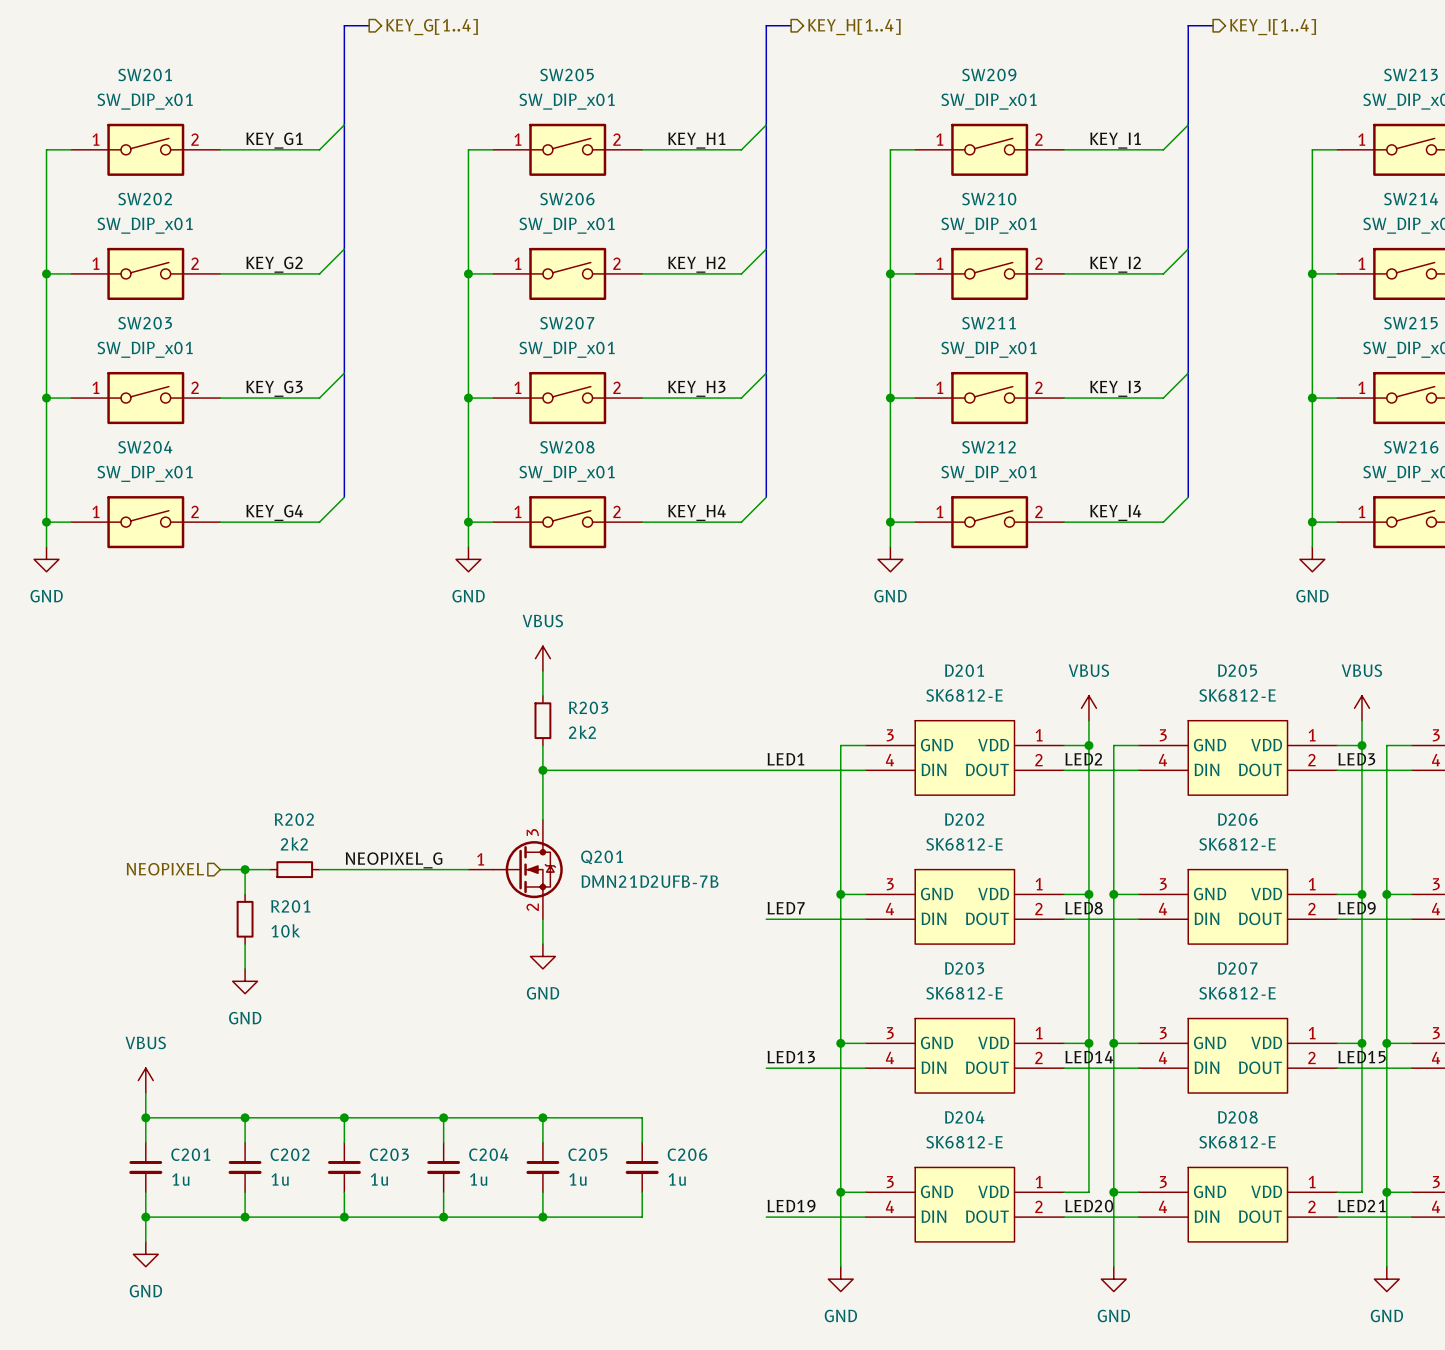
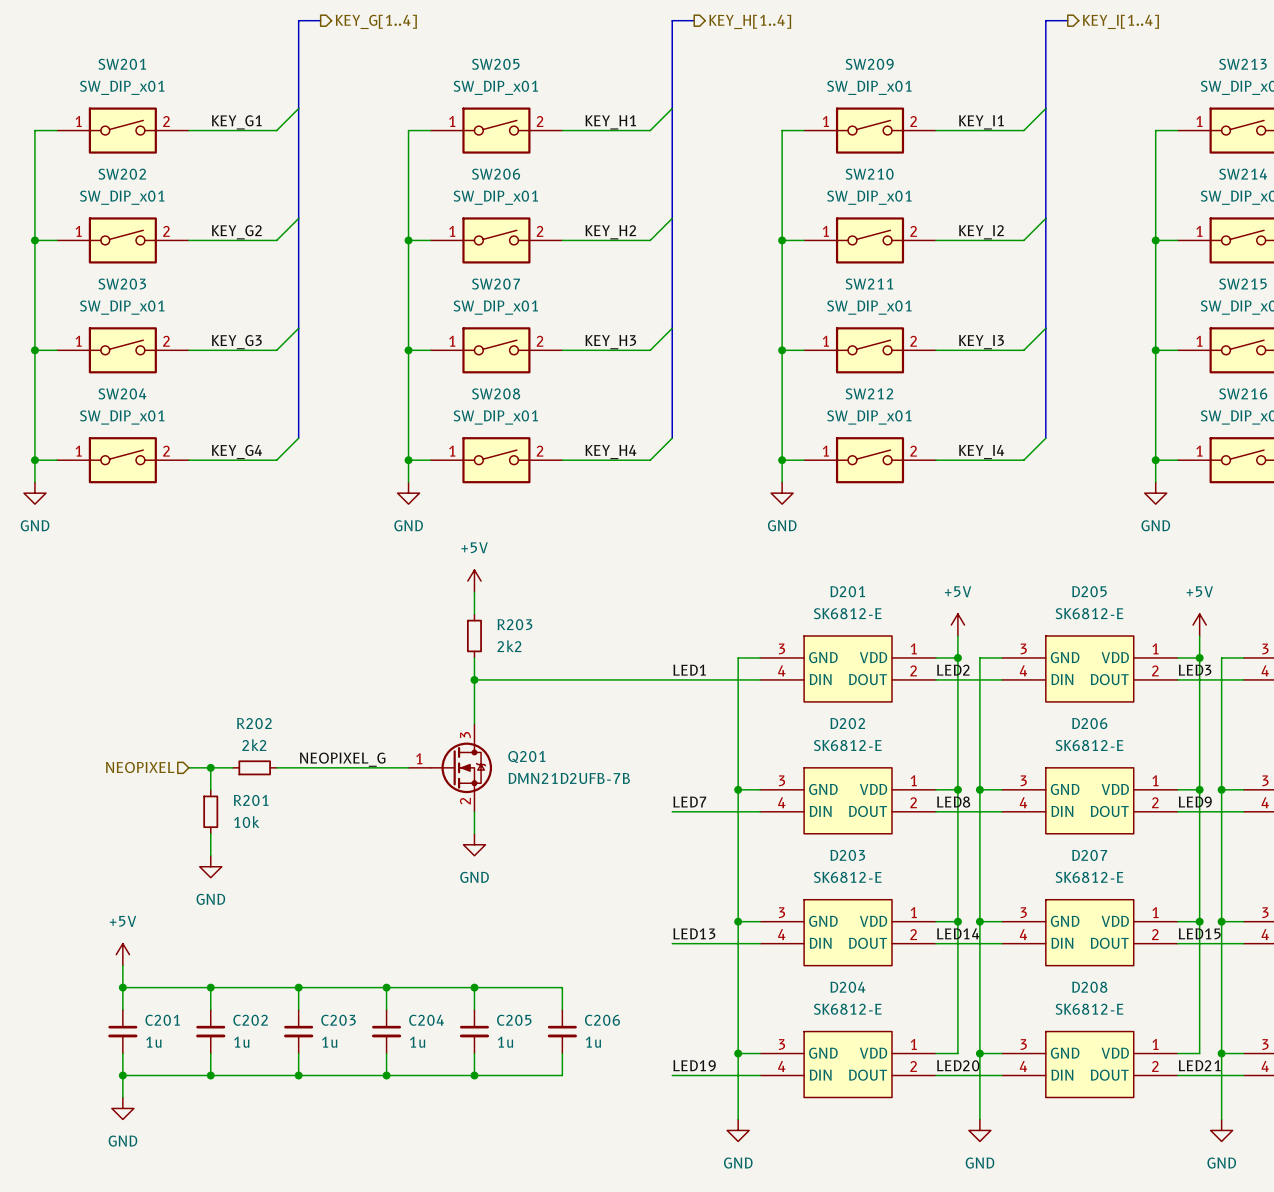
power symbol: VBUS (542, 658) -> +5V (474, 581)
power symbol: VBUS (1088, 708) -> +5V (957, 625)
power symbol: VBUS (1361, 708) -> +5V (1199, 625)
power symbol: VBUS (145, 1080) -> +5V (122, 954)

